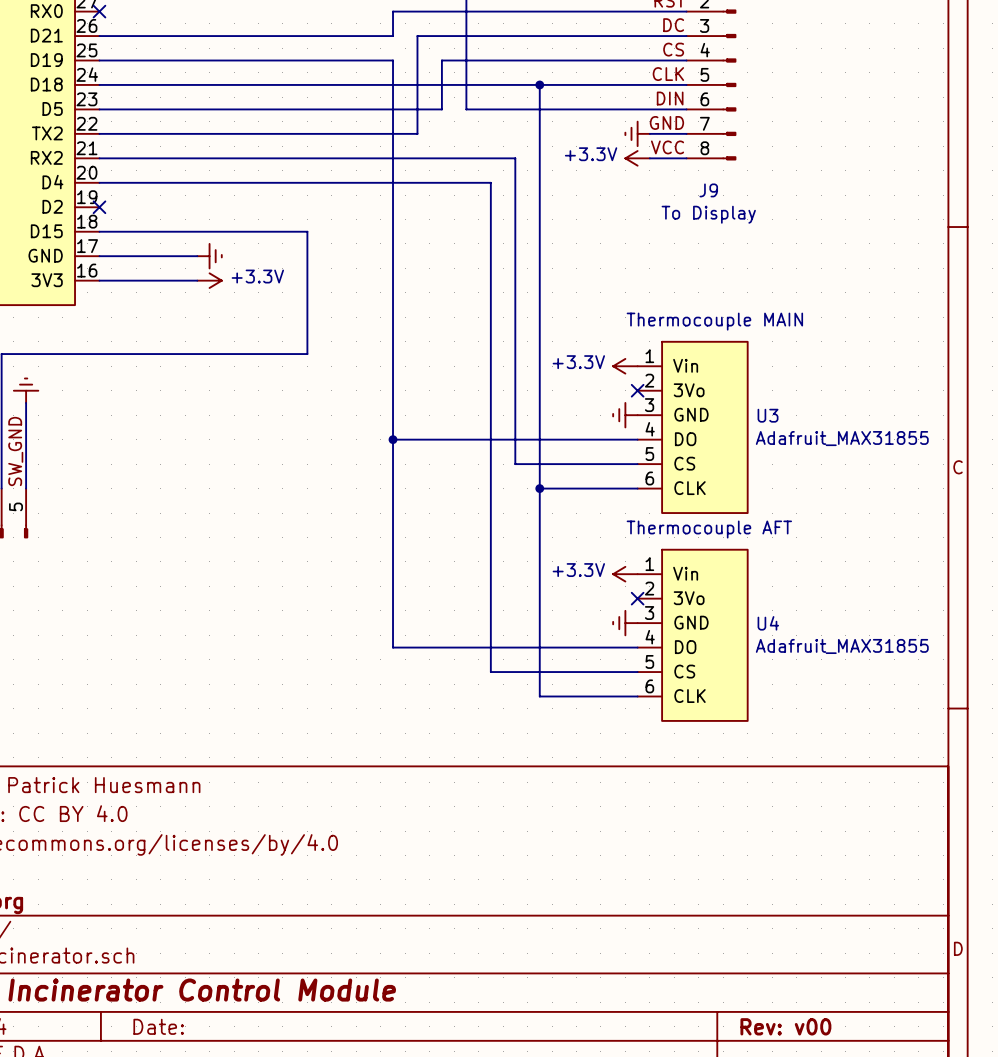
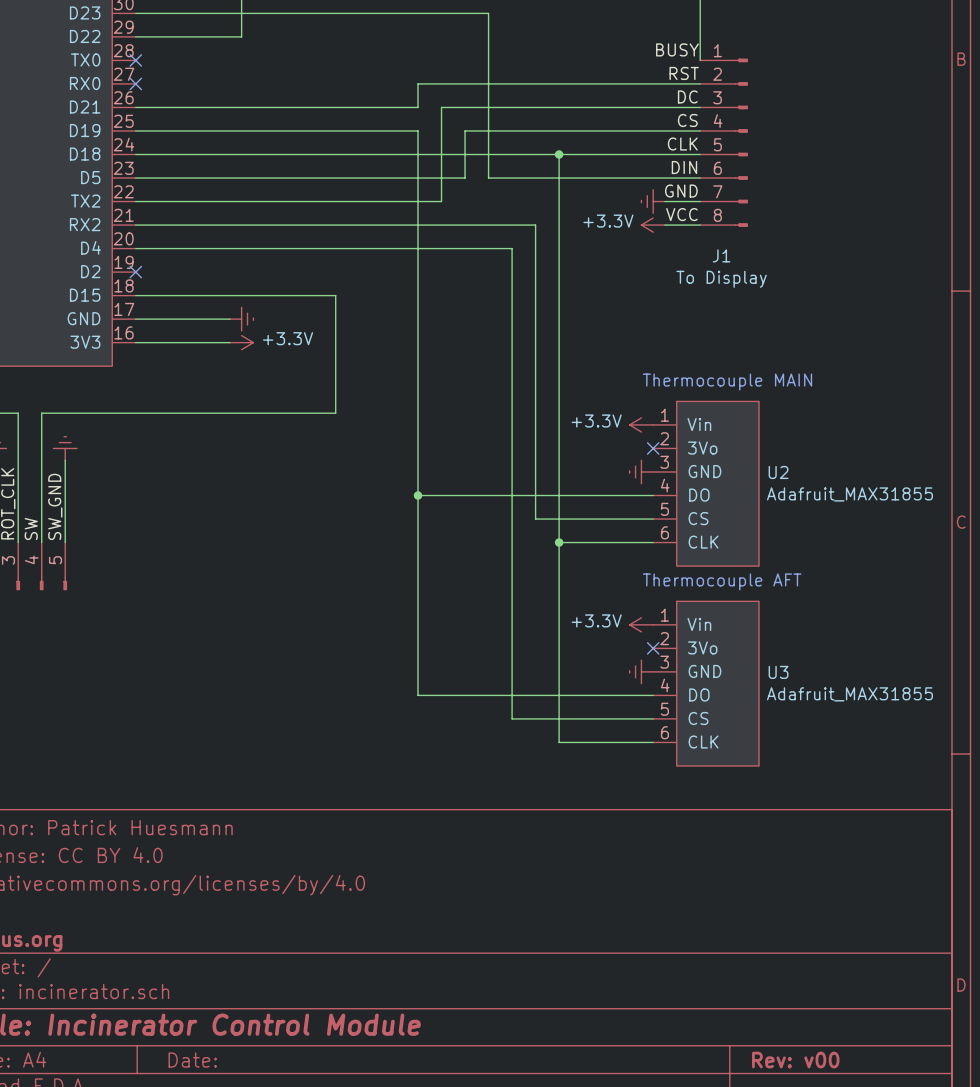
J9 name: J9 (708, 190) -> J1 (721, 255)
U3 name: U3 (768, 415) -> U2 (778, 472)
U4 name: U4 (768, 623) -> U3 (778, 672)

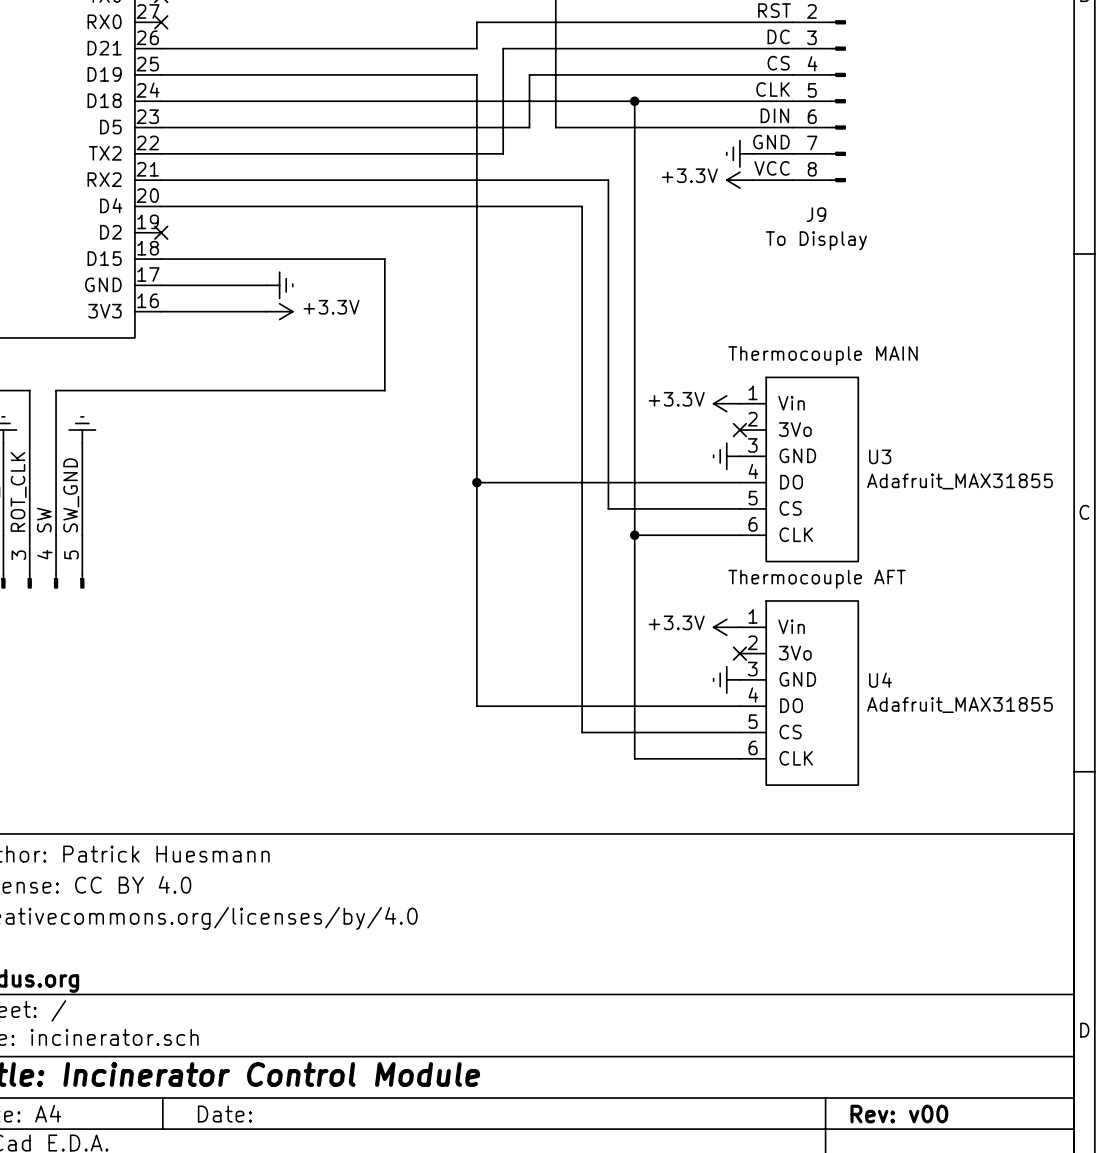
J1 name: J1 (721, 255) -> J9 (816, 214)
U2 name: U2 (778, 472) -> U3 (880, 456)
U3 name: U3 (778, 672) -> U4 (880, 680)

